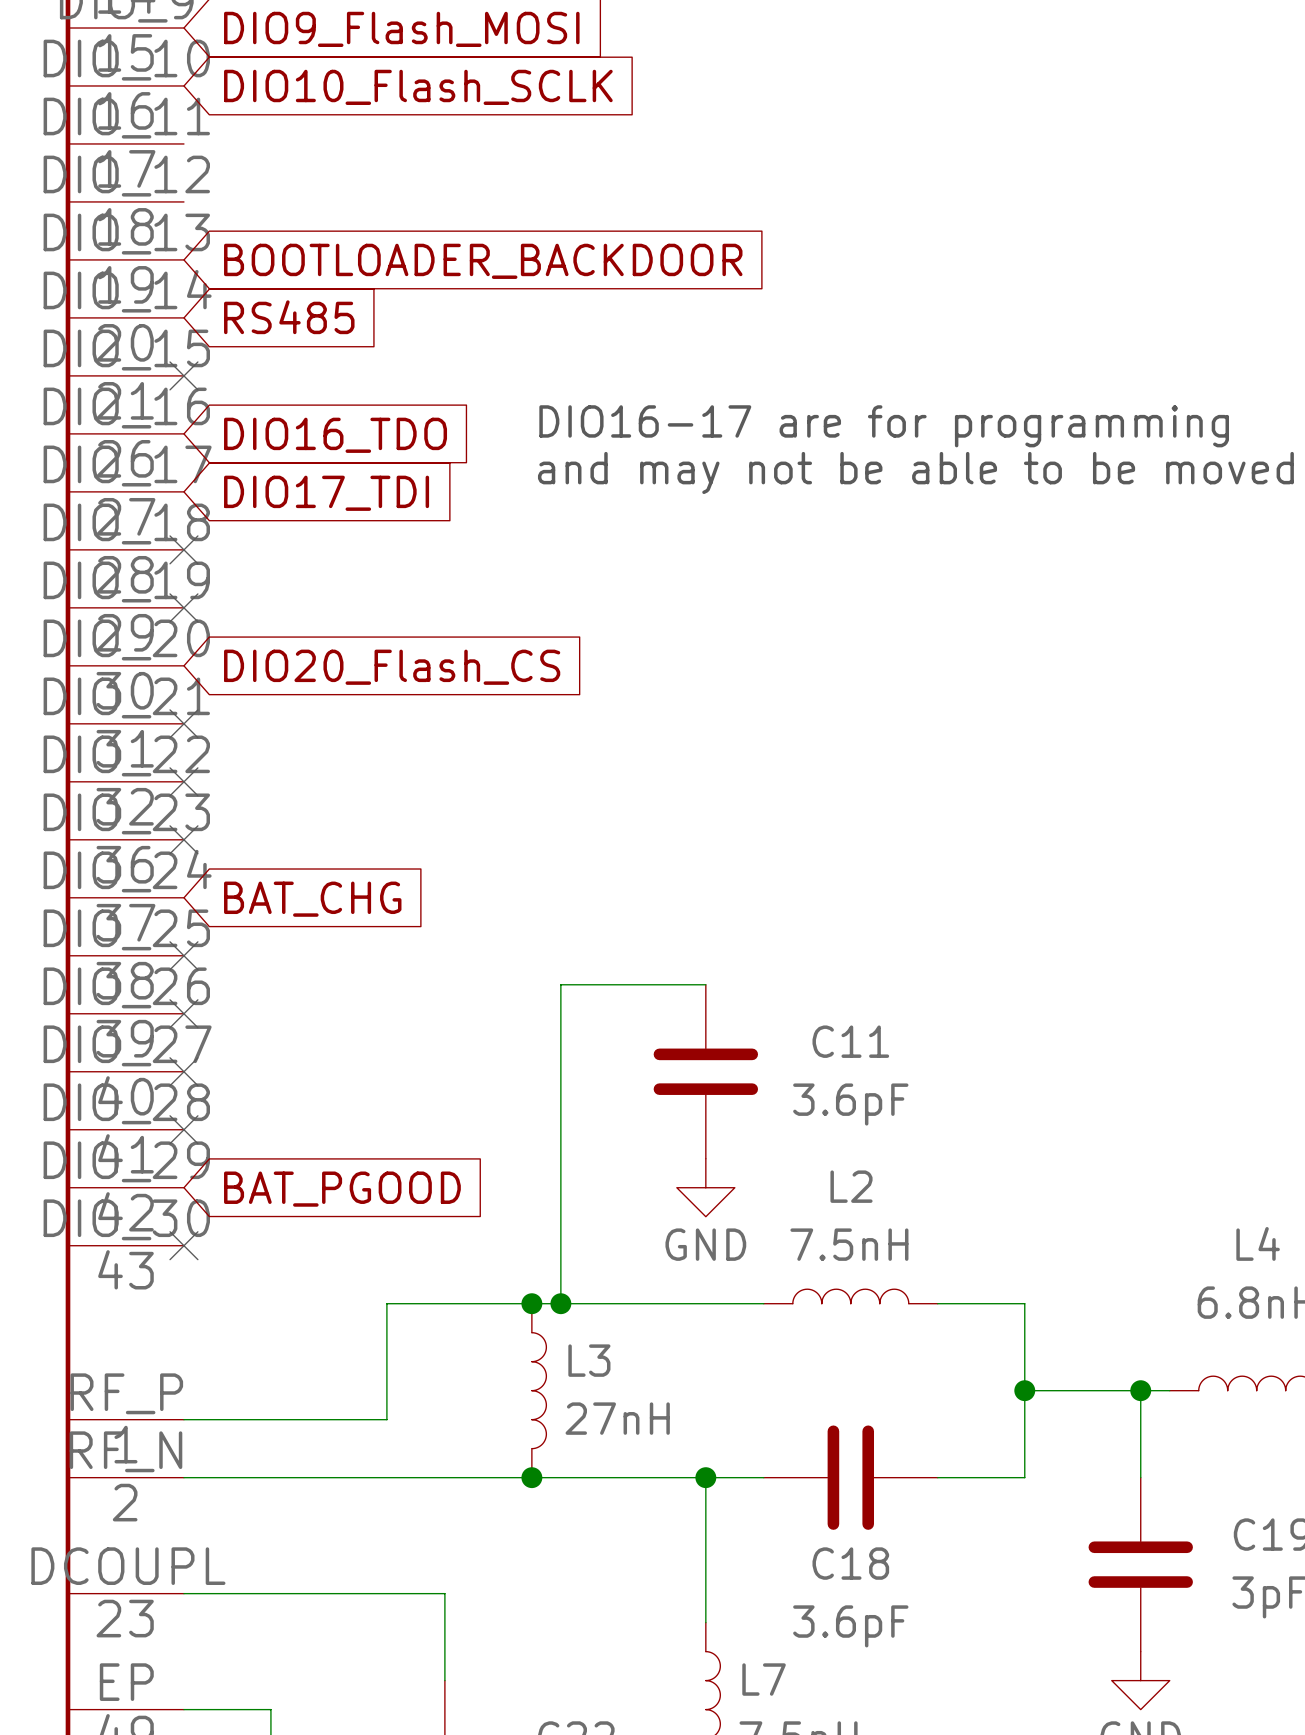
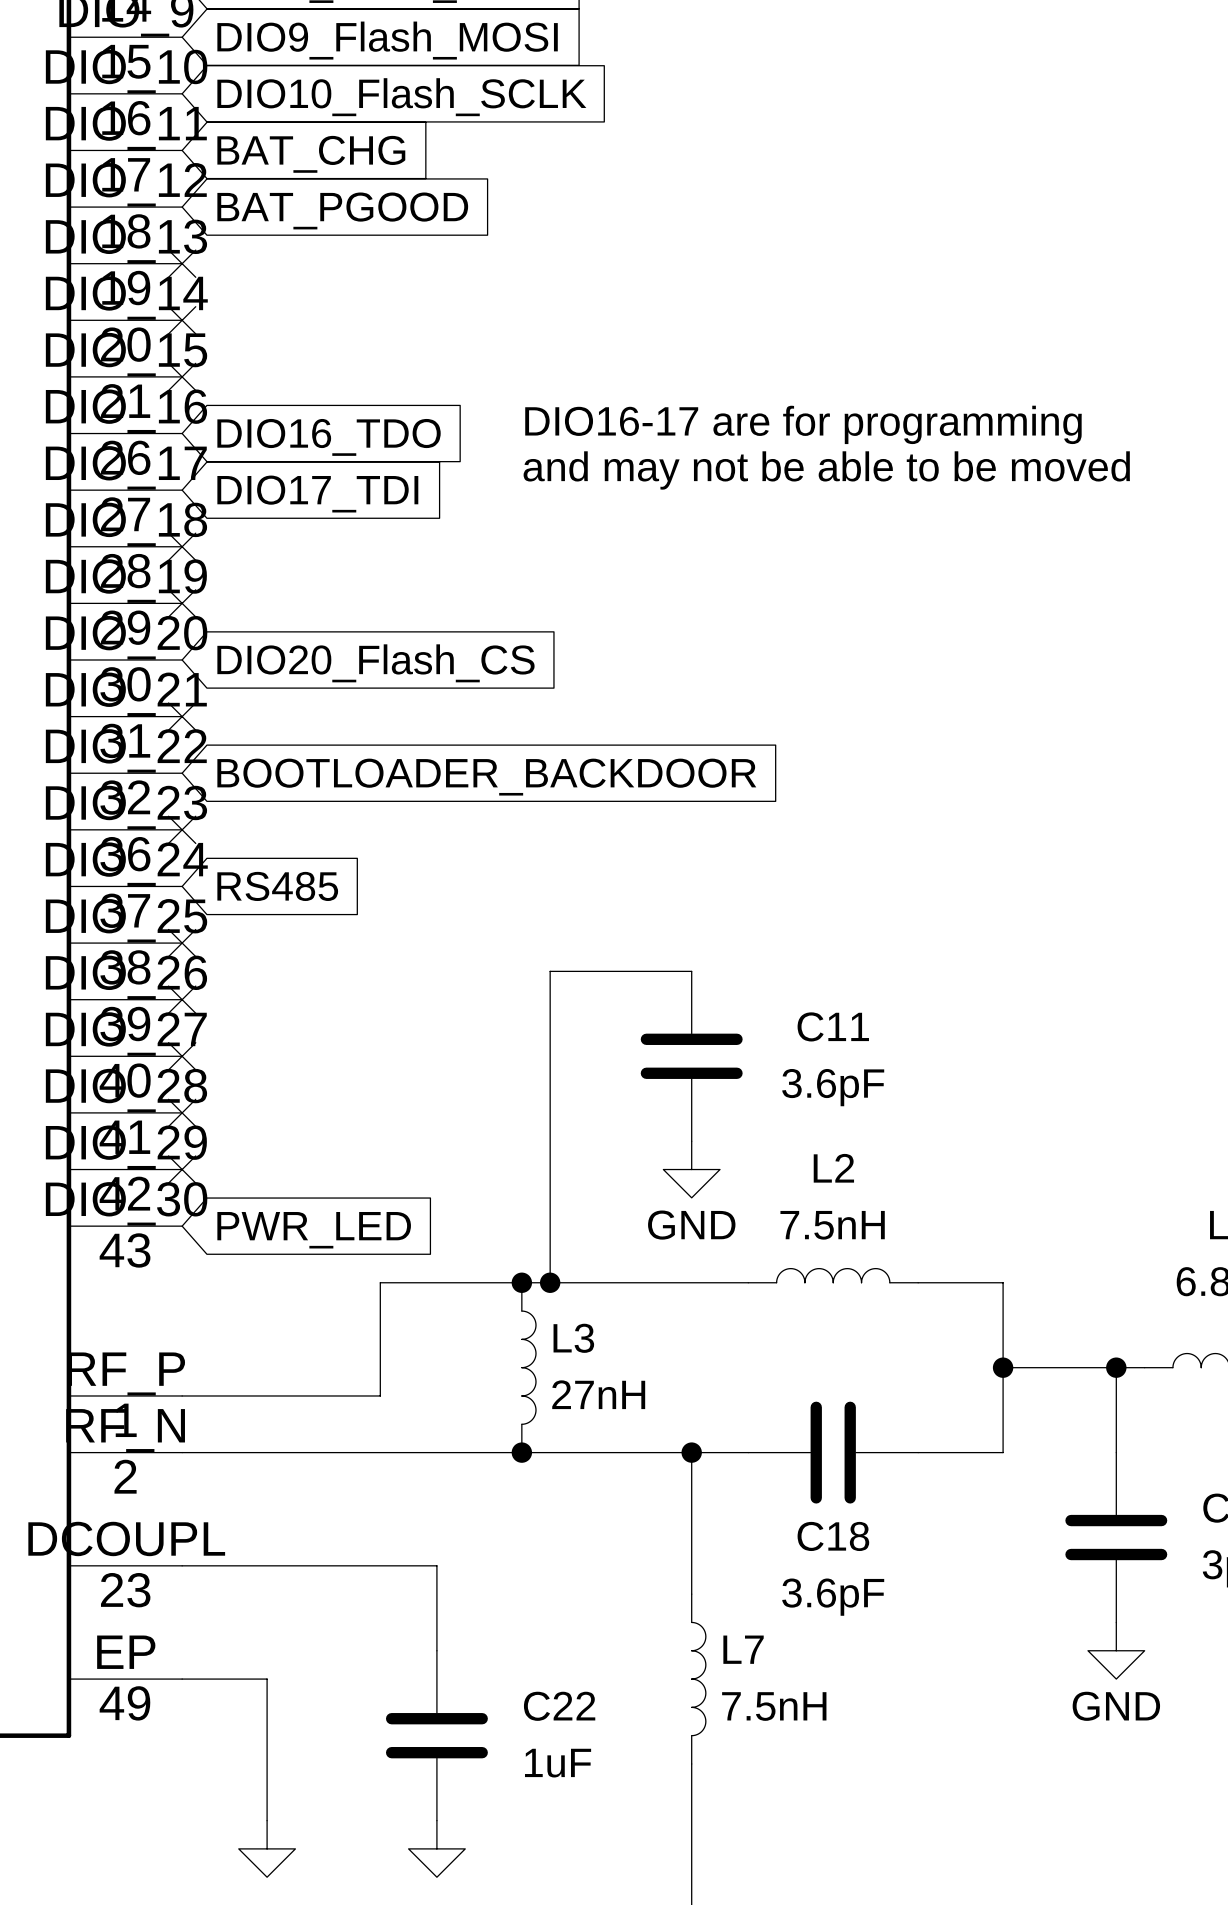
global label: none -> BAT_CHG (311, 154)
global label: none -> BAT_PGOOD (342, 210)
no-connect mark: none -> (182, 263)
global label position: BOOTLOADER_BACKDOOR (483, 261) -> BOOTLOADER_BACKDOOR (486, 777)
no-connect mark: none -> (182, 320)
global label: RS485 (289, 317) -> none
no-connect mark: (183, 781) -> none
global label: BAT_CHG (312, 899) -> RS485 (277, 886)
global label: BAT_PGOOD (342, 1189) -> none
no-connect mark position: (183, 1245) -> (182, 1169)
global label: none -> PWR_LED (314, 1230)

